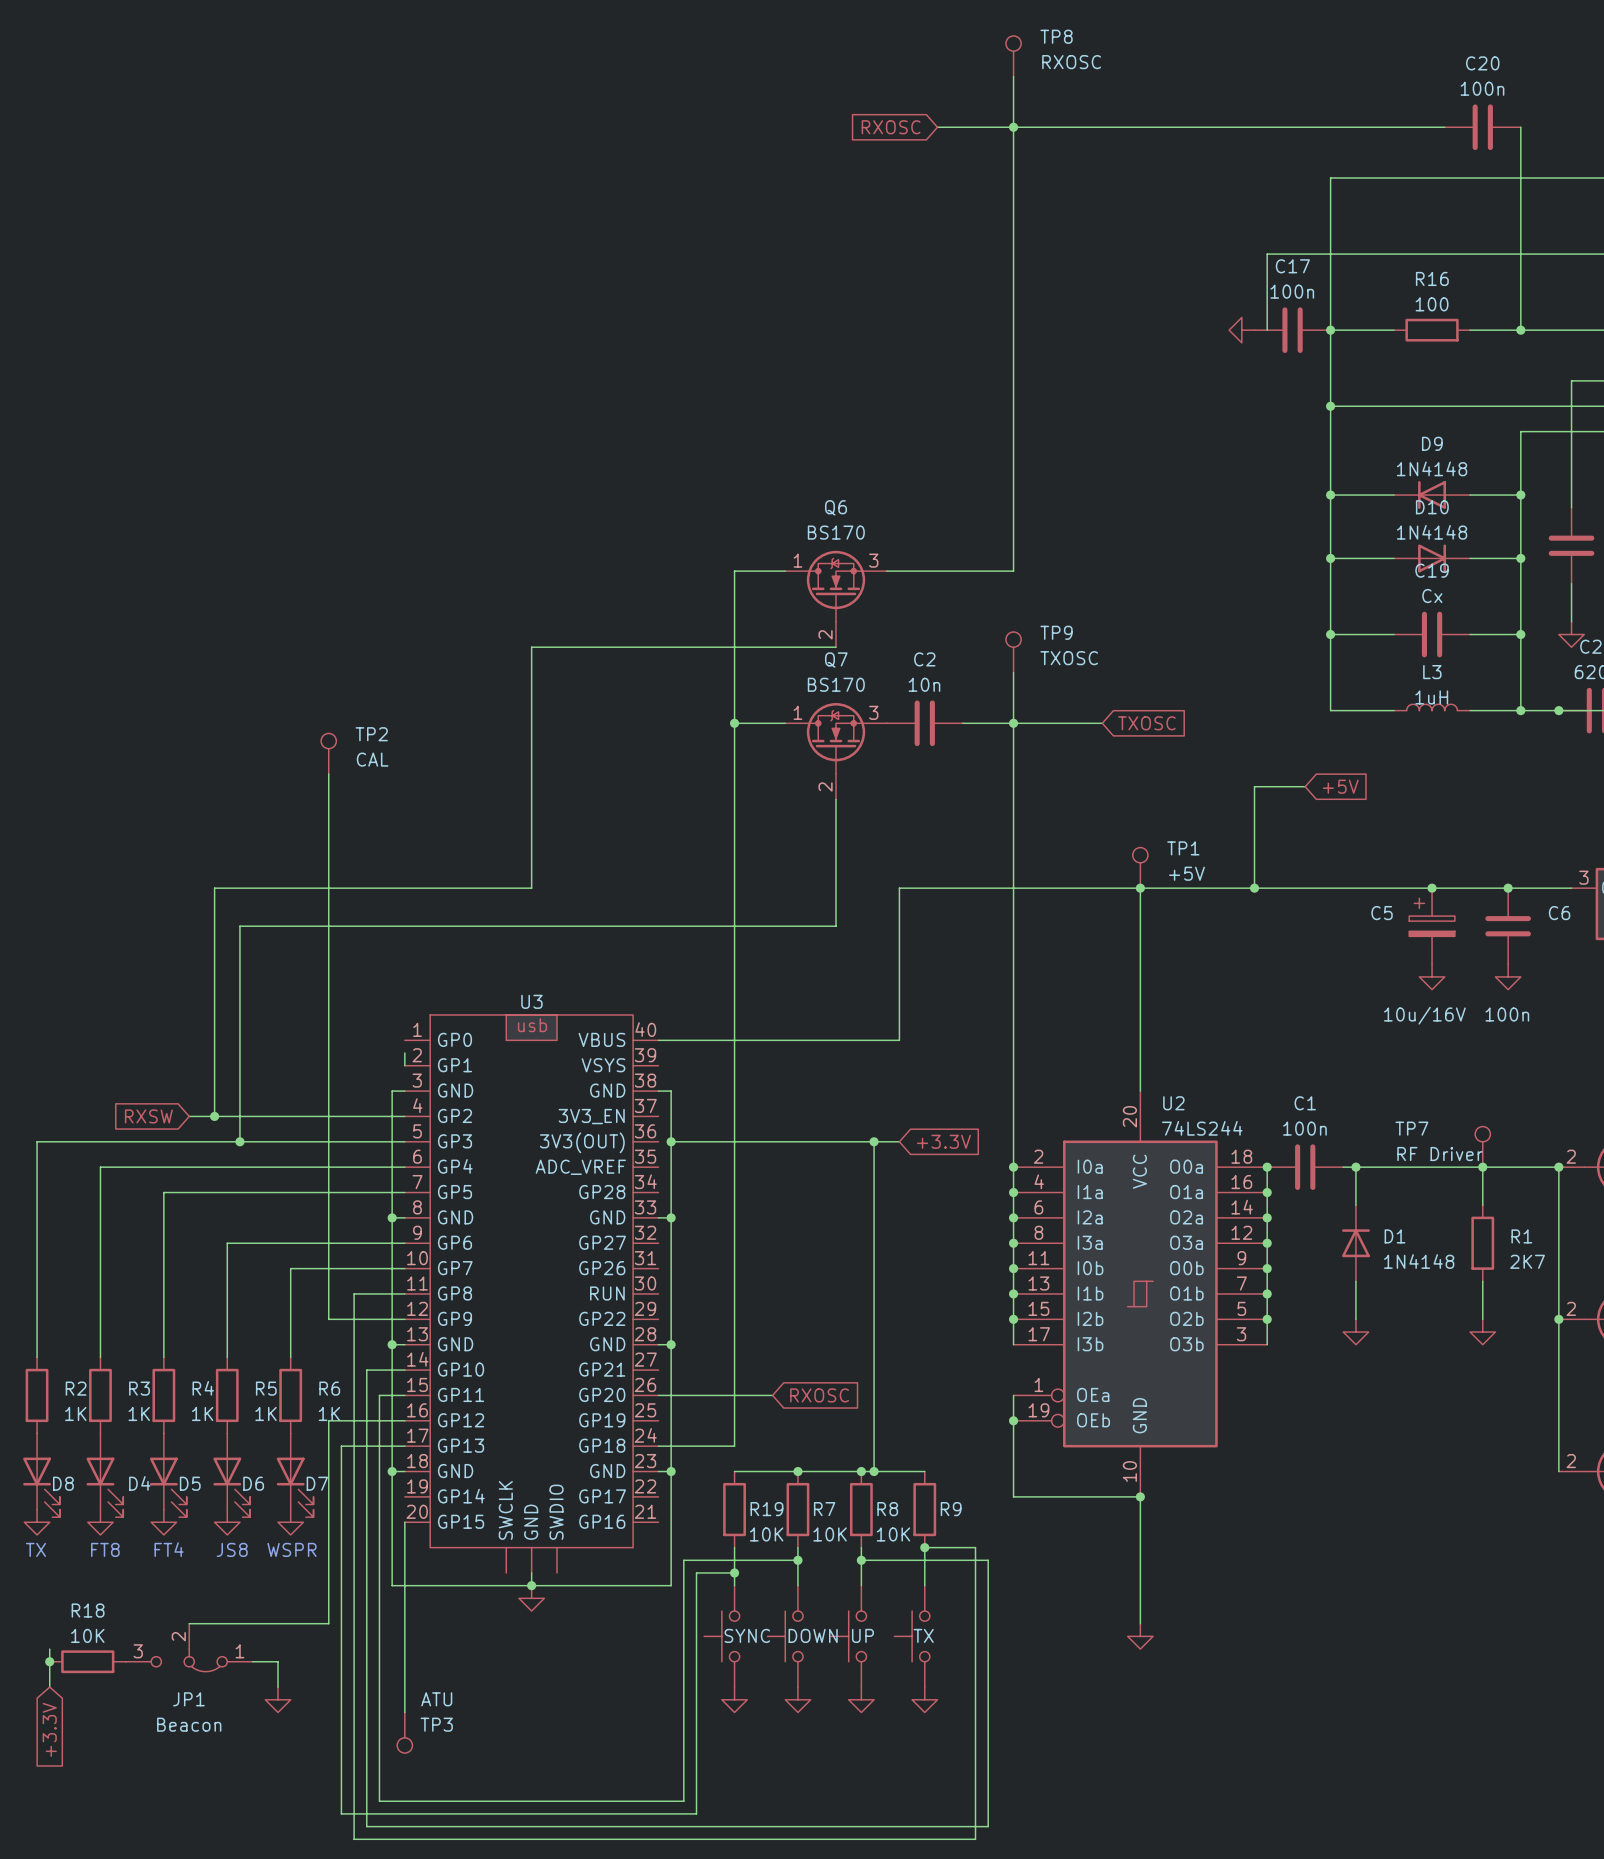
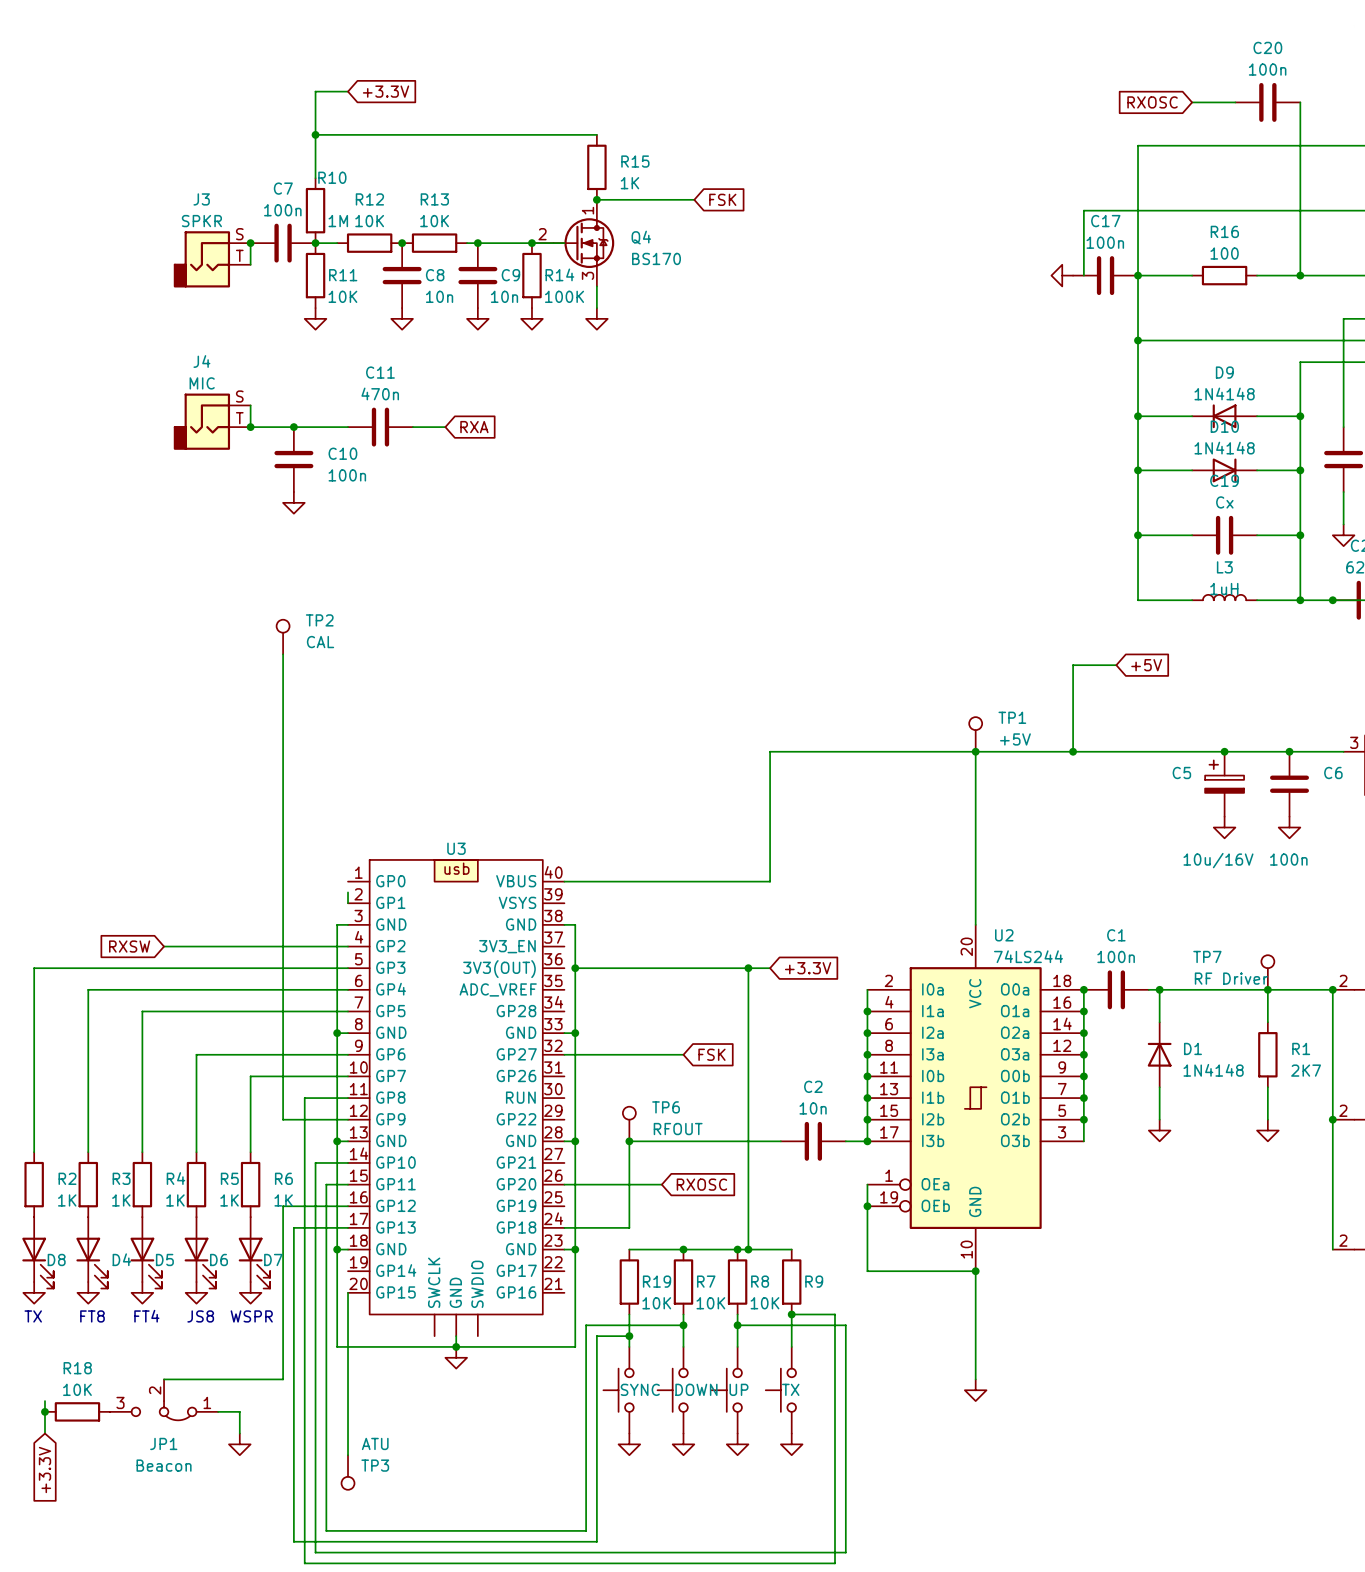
TP8: RXOSC (1013, 56) -> none
wire: (1013, 76) (1013, 571) (886, 571) -> none
wire: none -> (348, 91) (315, 91) (315, 178)
global label: none -> +3.3V (386, 91)
global label: RXOSC (891, 127) -> none
wire: (937, 127) (1394, 127) -> none
junction: (1013, 127) -> none
global label: none -> RXOSC (1152, 102)
wire: none -> (315, 134) (596, 134)
junction: none -> (315, 134)
R15: none -> 1K (596, 167)
wire: none -> (596, 199) (694, 199)
junction: none -> (596, 199)
global label: none -> FSK (722, 199)
R10: none -> 1M (315, 210)
wire: none -> (250, 243) (250, 264)
junction: none -> (250, 243)
C7: none -> 100n (283, 243)
wire: none -> (315, 243) (337, 243)
junction: none -> (315, 243)
R12: none -> 10K (369, 243)
junction: none -> (402, 243)
R13: none -> 10K (434, 243)
wire: none -> (467, 243) (564, 243)
junction: none -> (477, 243)
junction: none -> (531, 243)
Q4: none -> BS170 (573, 243)
J3: none -> SPKR (212, 259)
R11: none -> 10K (315, 275)
C8: none -> 10n (402, 275)
C9: none -> 10n (477, 275)
R14: none -> 100K (531, 275)
wire: none -> (596, 286) (596, 308)
power symbol: none -> (315, 318)
power symbol: none -> (402, 318)
power symbol: none -> (477, 318)
power symbol: none -> (531, 318)
power symbol: none -> (596, 318)
wire: none -> (250, 405) (250, 427) (348, 427)
J4: none -> MIC (212, 421)
junction: none -> (250, 427)
junction: none -> (293, 427)
C11: none -> 470n (380, 427)
wire: none -> (412, 427) (445, 427)
global label: none -> RXA (474, 427)
C10: none -> 100n (293, 459)
wire: (785, 571) (734, 571) (734, 1344) -> (780, 1141) (629, 1141)
power symbol: none -> (293, 502)
Q6: BS170 (836, 599) -> none
wire: (836, 647) (531, 647) (531, 888) (214, 888) (214, 1116) -> none
TP9: TXOSC (1013, 652) -> none
wire: (1013, 672) (1013, 1167) -> none
wire: (734, 723) (785, 723) -> none
junction: (734, 723) -> none
C2 position: (924, 723) -> (813, 1141)
wire: (962, 723) (1102, 723) -> none
junction: (1013, 723) -> none
global label: TXOSC (1146, 723) -> none
Q7: BS170 (836, 751) -> none
wire: (836, 799) (836, 926) (239, 926) (239, 1141) -> none
junction: (214, 1116) -> none
junction: (239, 1141) -> none
junction: (1013, 1167) -> none
wire: none -> (564, 1054) (683, 1054)
global label: none -> FSK (711, 1054)
TP6: none -> RFOUT (629, 1124)
junction: none -> (629, 1141)
wire: none -> (845, 1141) (867, 1141)
junction: none -> (867, 1141)

